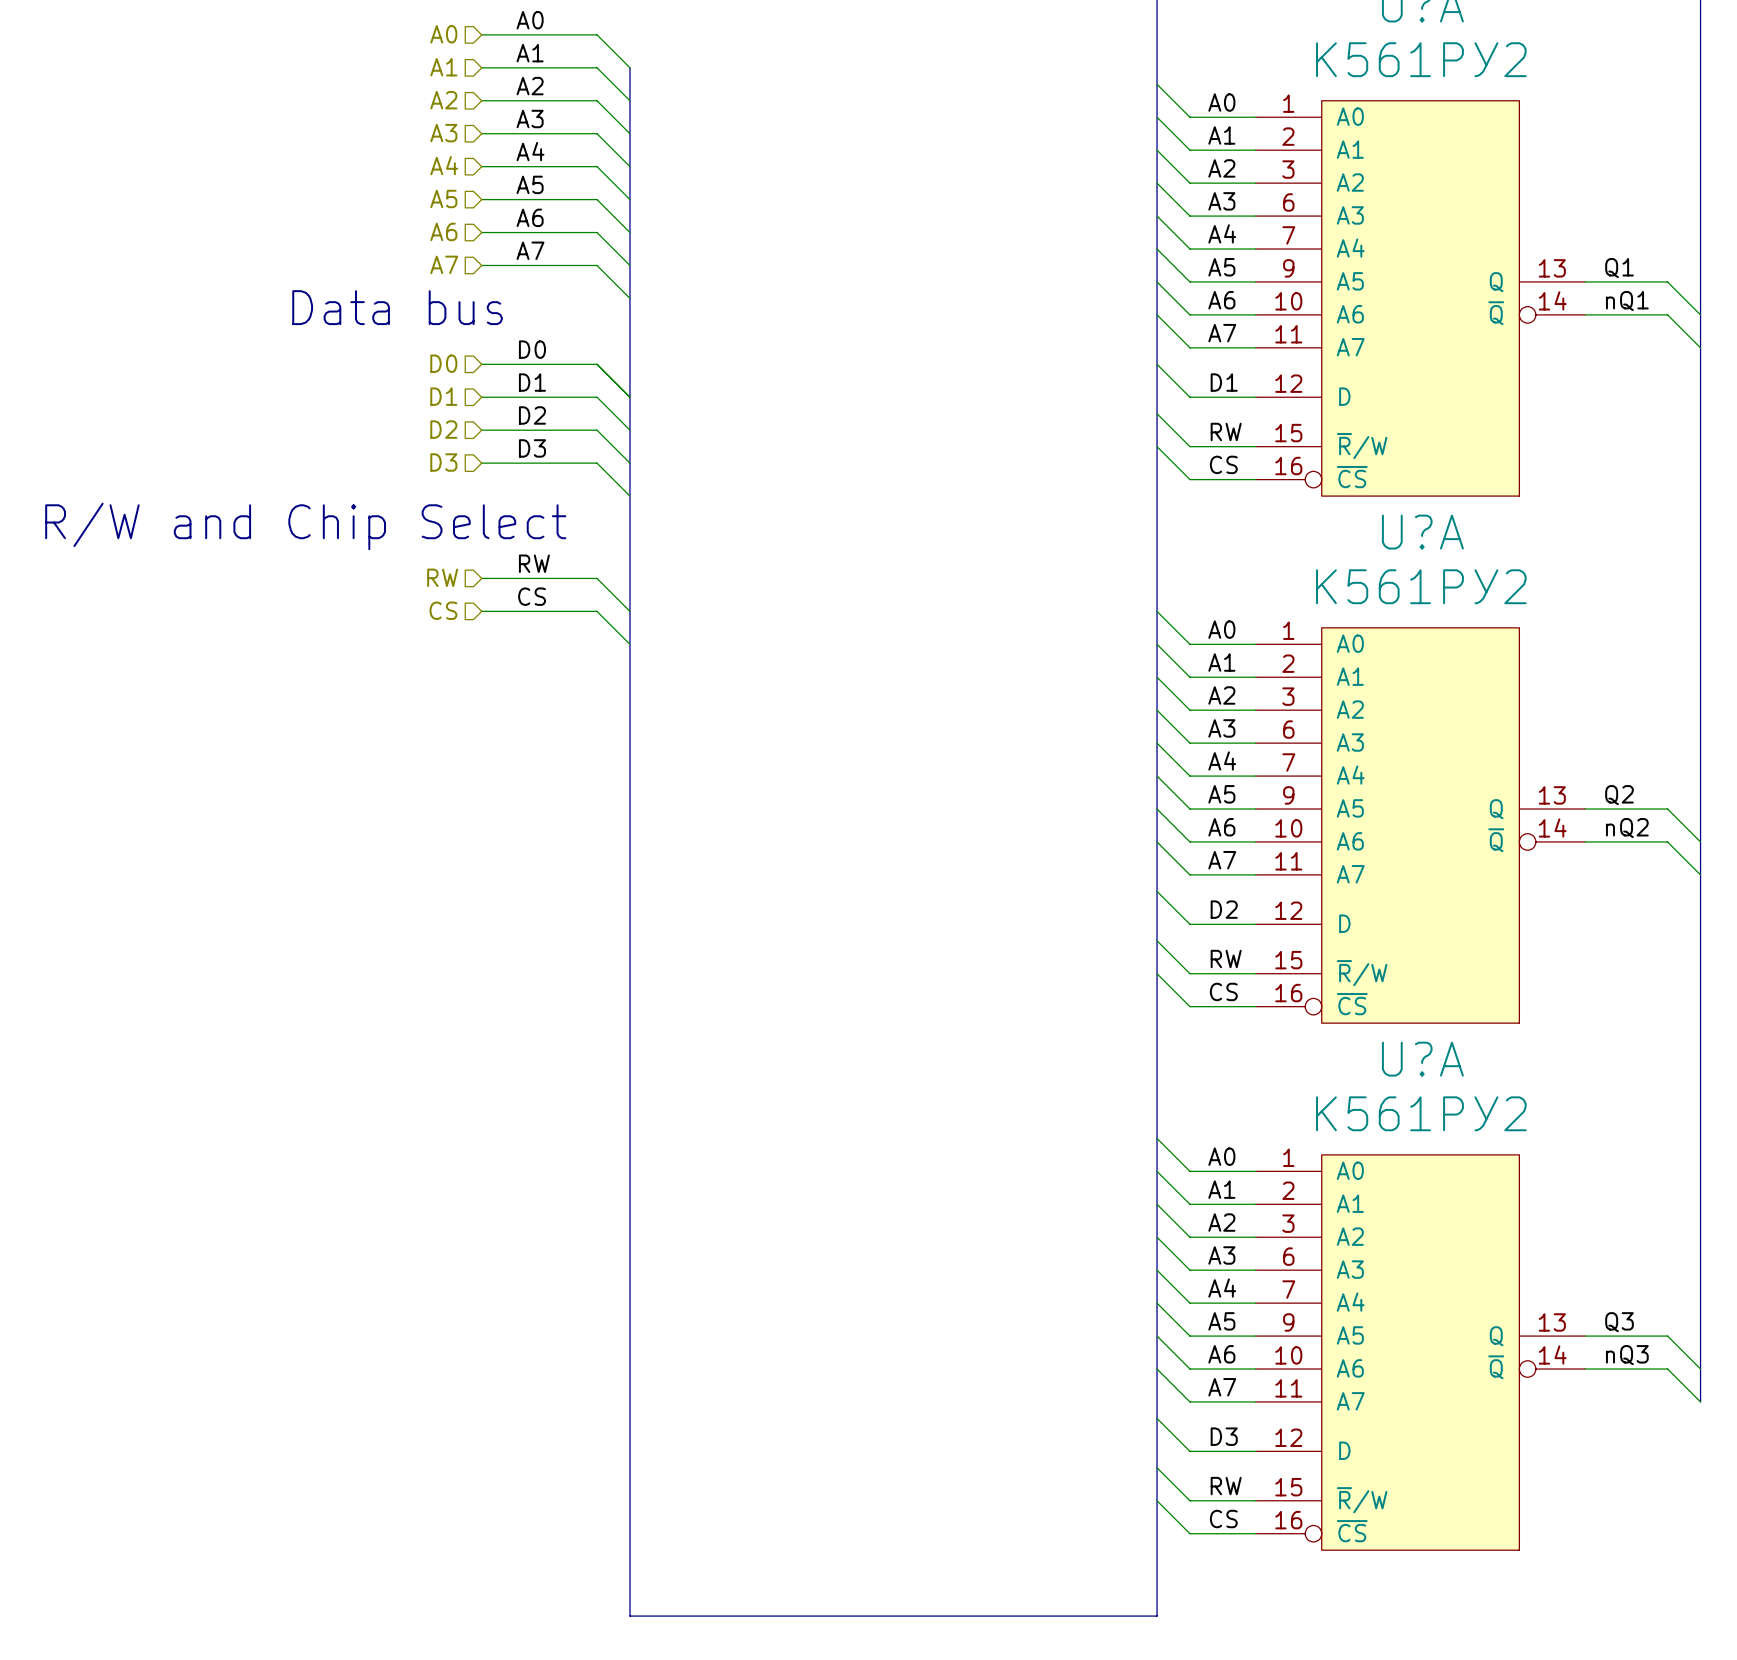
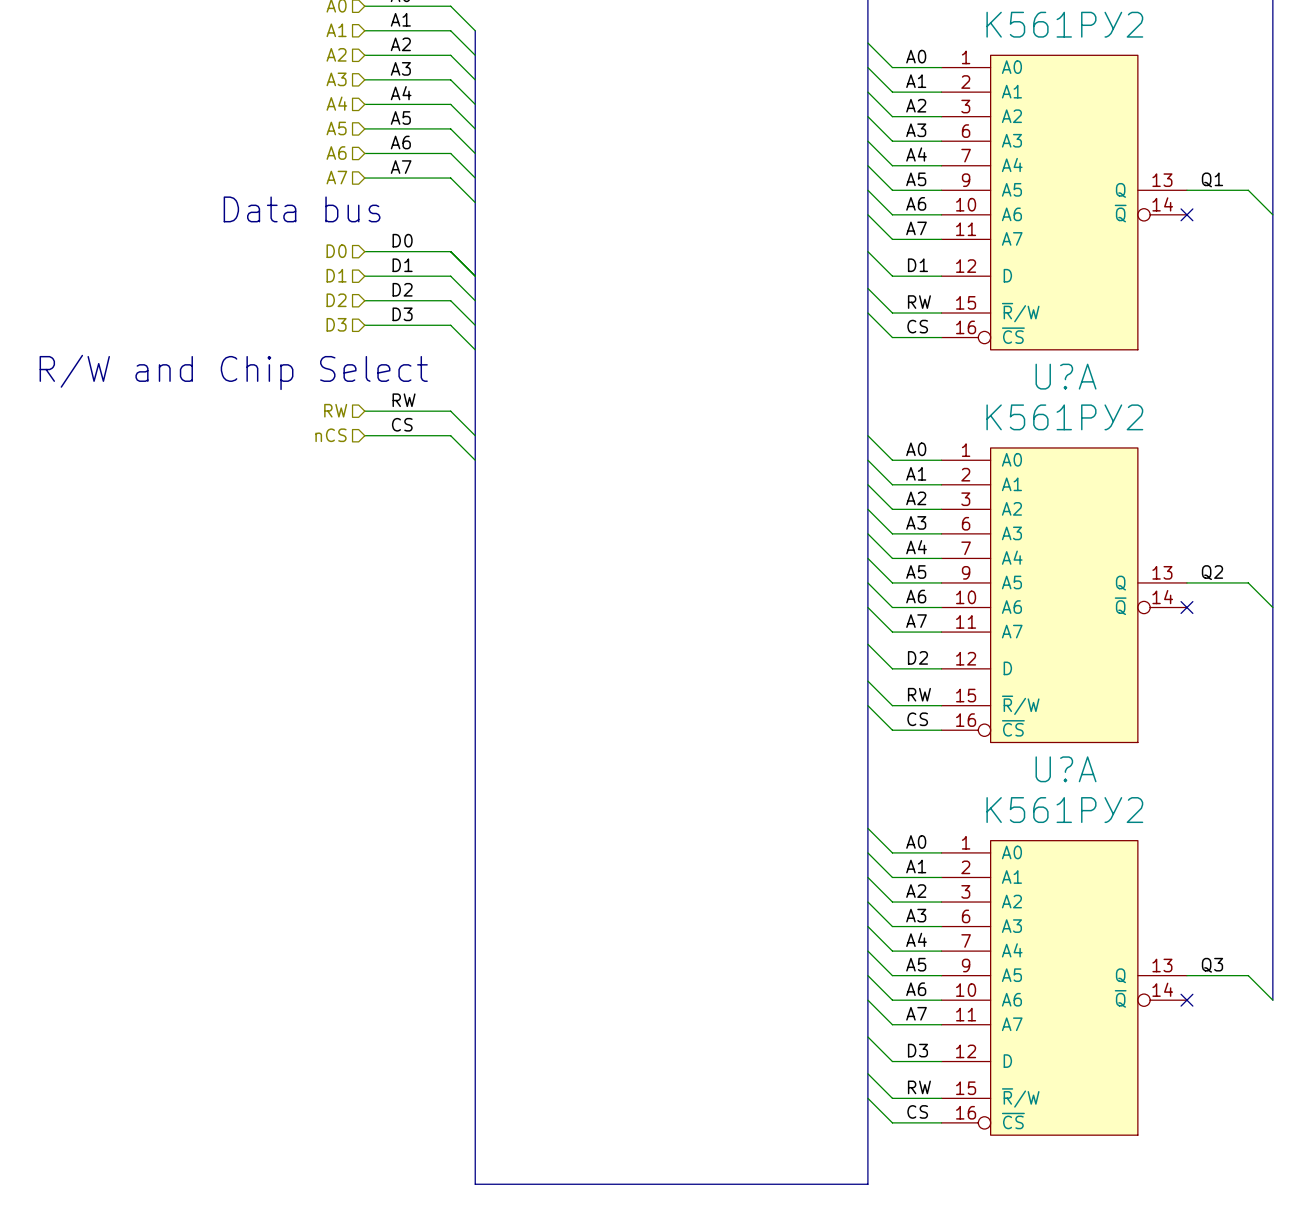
label: nQ1 (1627, 300) -> none
wire: (1585, 314) (1667, 314) (1700, 347) -> none
no-connect mark: none -> (1186, 214)
hierarchical label: CS (443, 610) -> nCS (331, 435)
label: nQ2 (1627, 828) -> none
wire: (1585, 841) (1667, 841) (1700, 874) -> none
no-connect mark: none -> (1186, 607)
label: nQ3 (1627, 1355) -> none
wire: (1585, 1369) (1667, 1369) (1700, 1401) -> none
no-connect mark: none -> (1186, 1000)
bus: (1700, 1369) (1700, 1401) -> none

